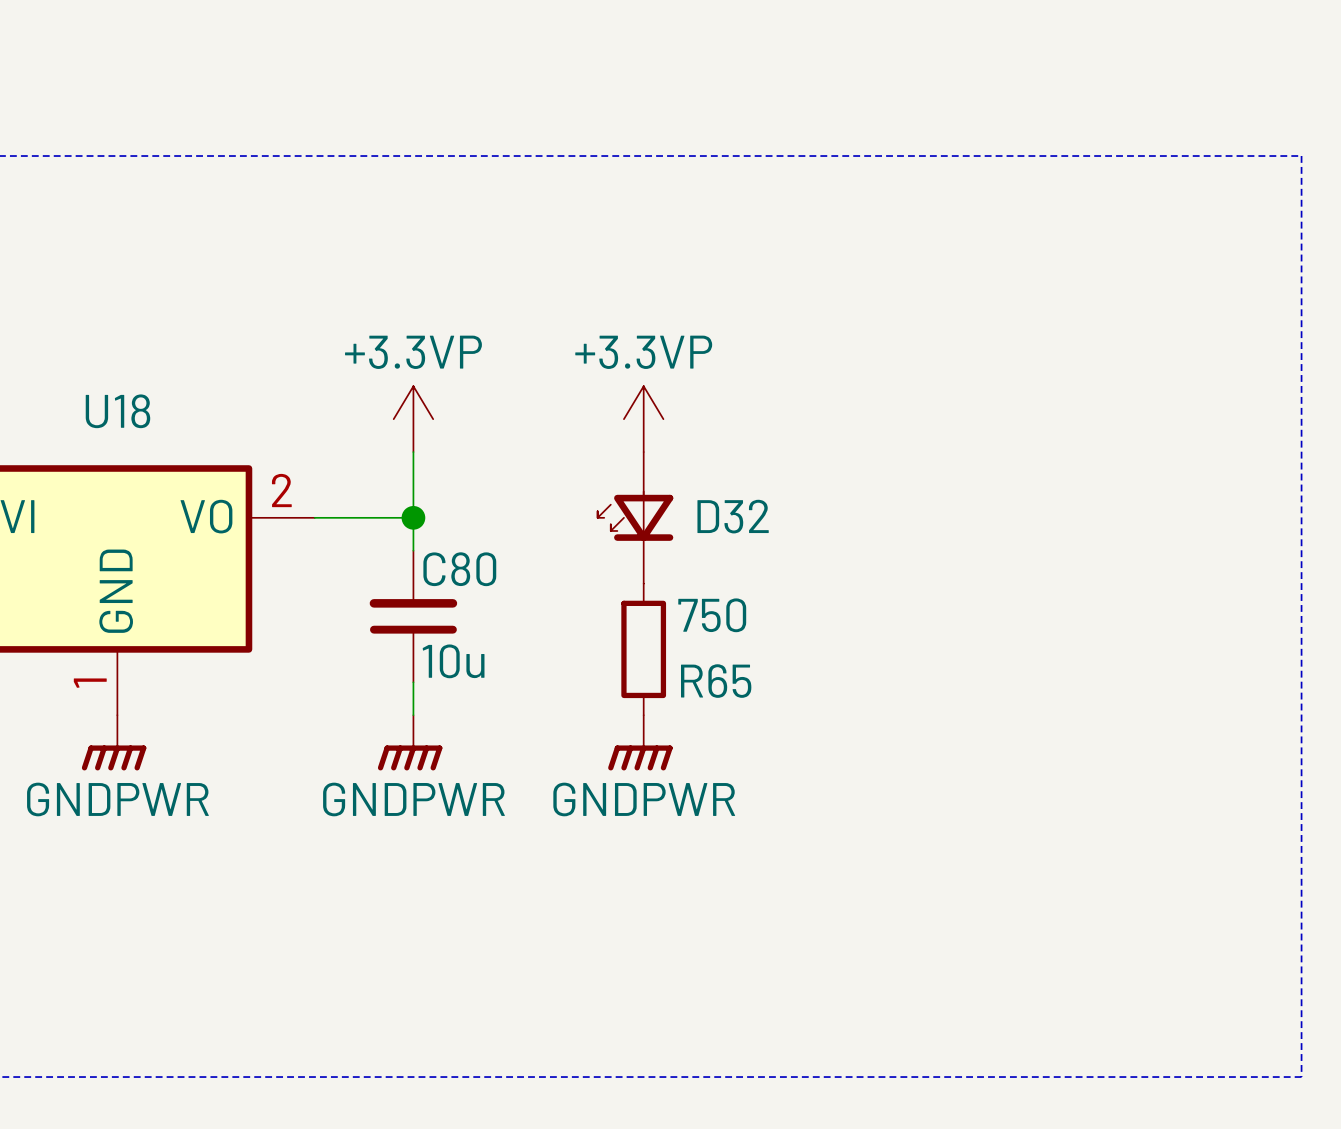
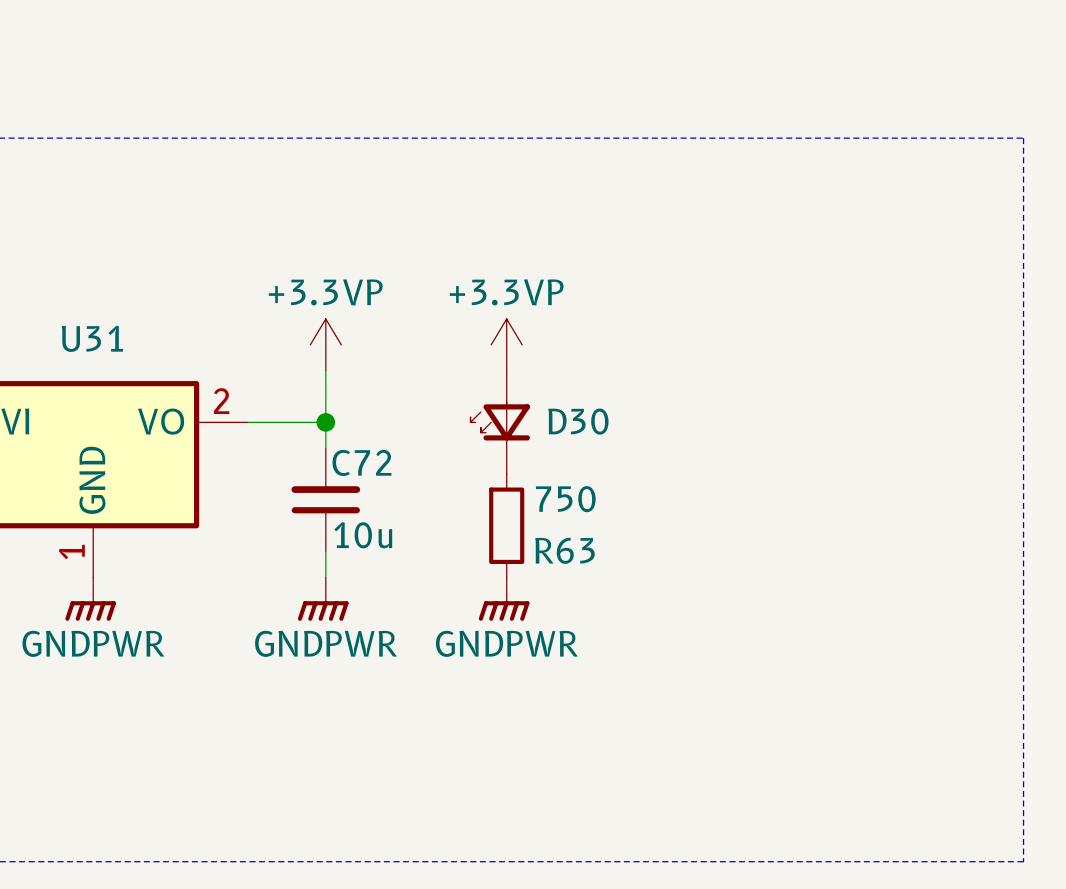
U18 name: U18 (117, 411) -> U31 (92, 338)
D32 name: D32 (733, 516) -> D30 (578, 421)
C80 name: C80 (459, 569) -> C72 (361, 462)
R65 name: R65 (716, 681) -> R63 (564, 550)

